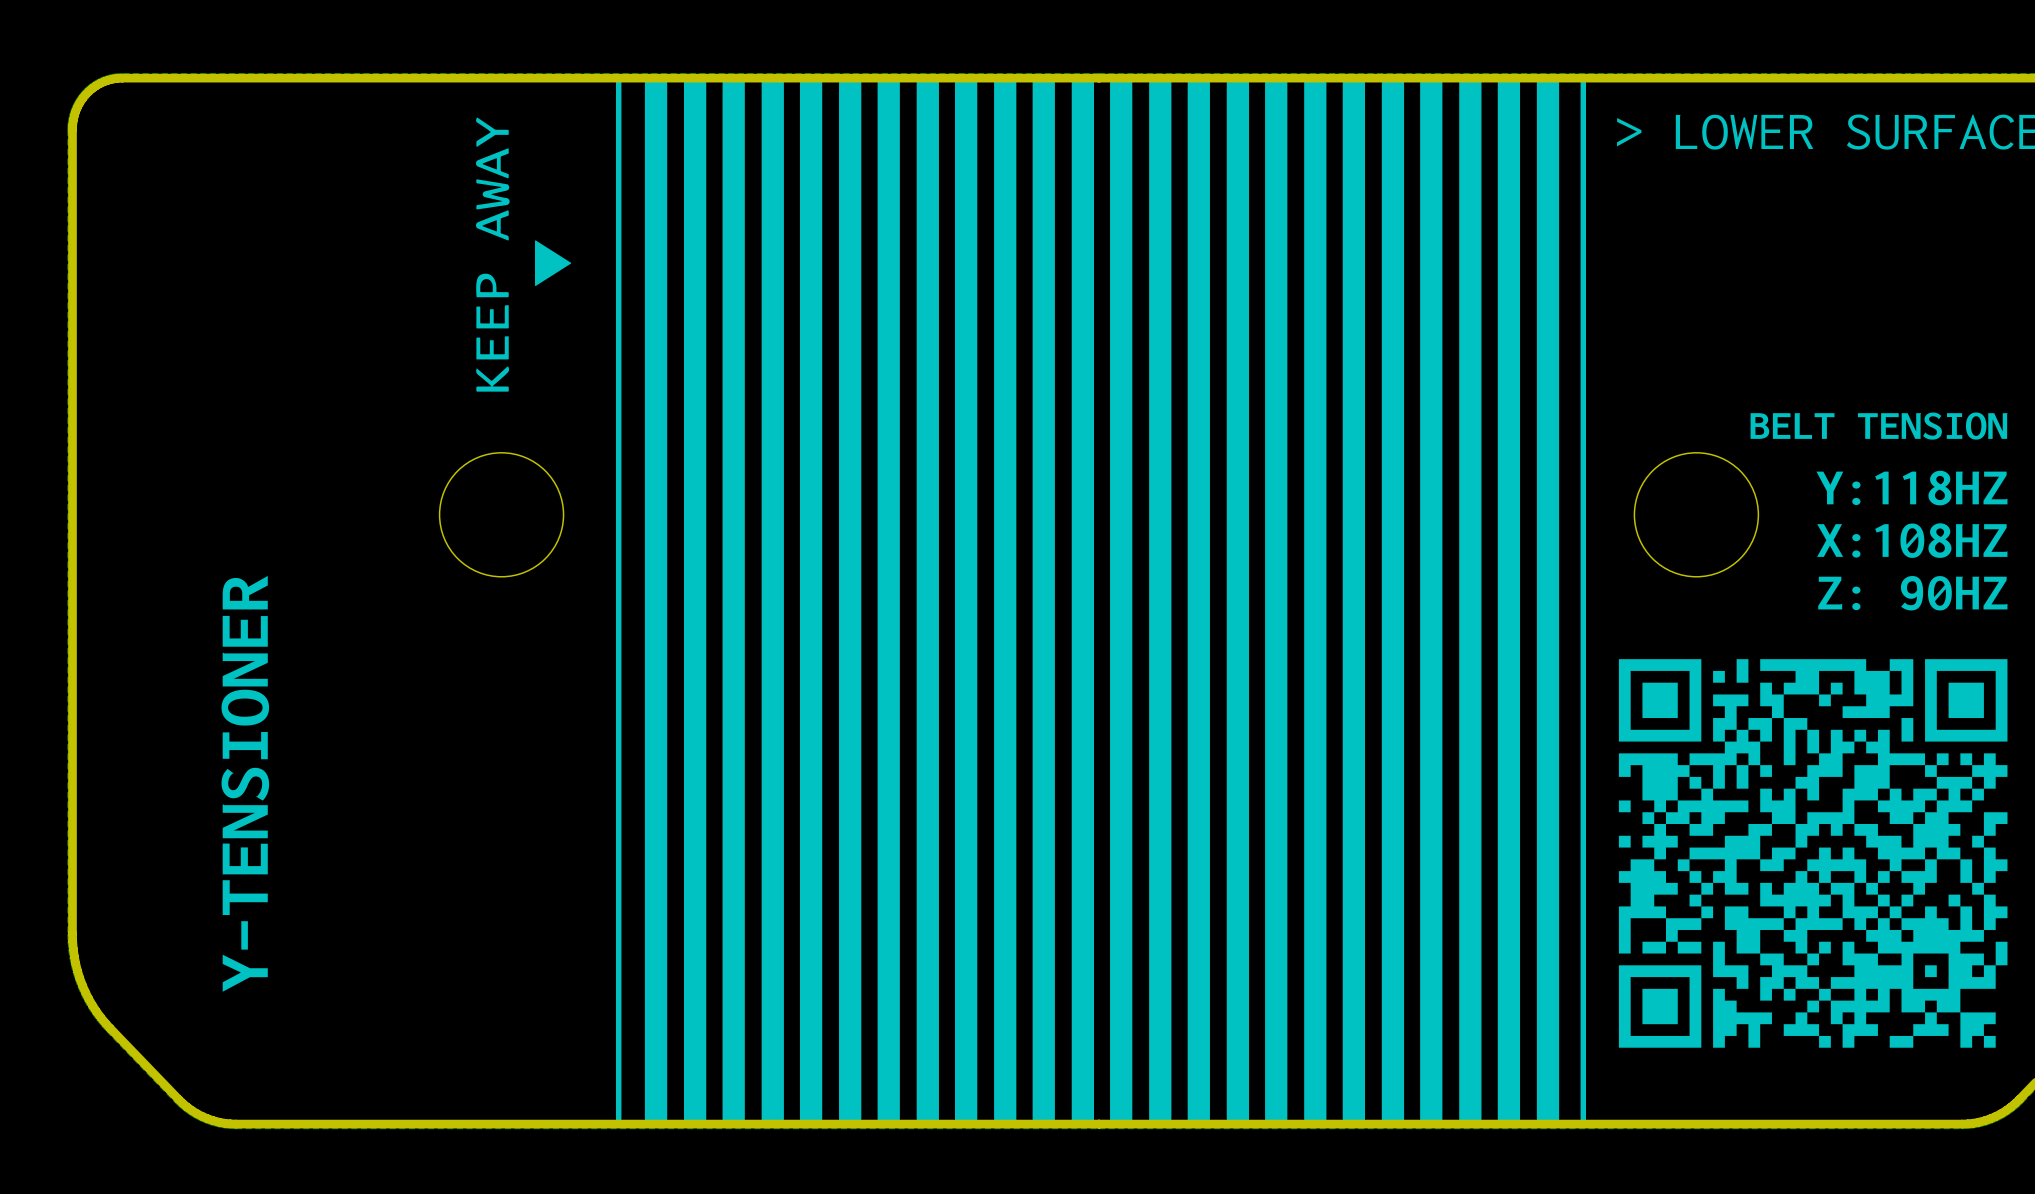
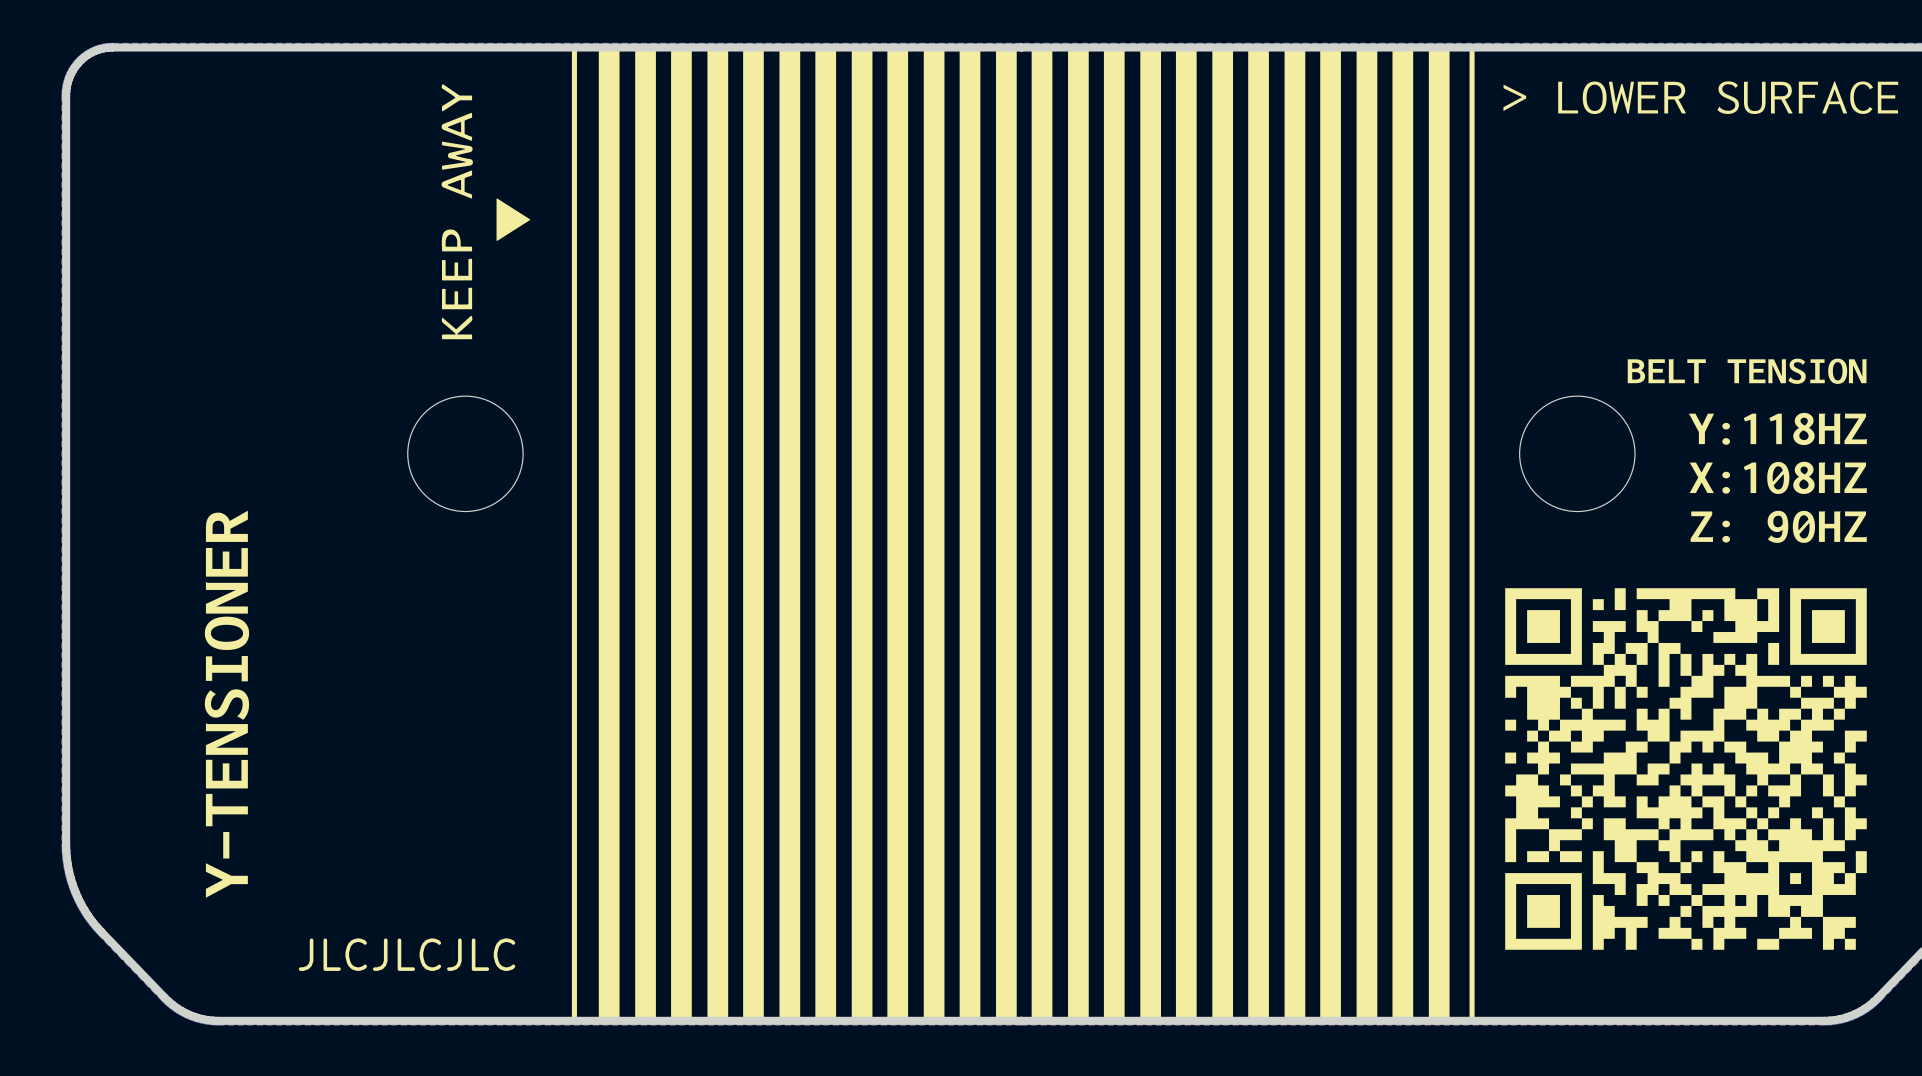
text: none -> JLCJLCJLC (407, 954)

